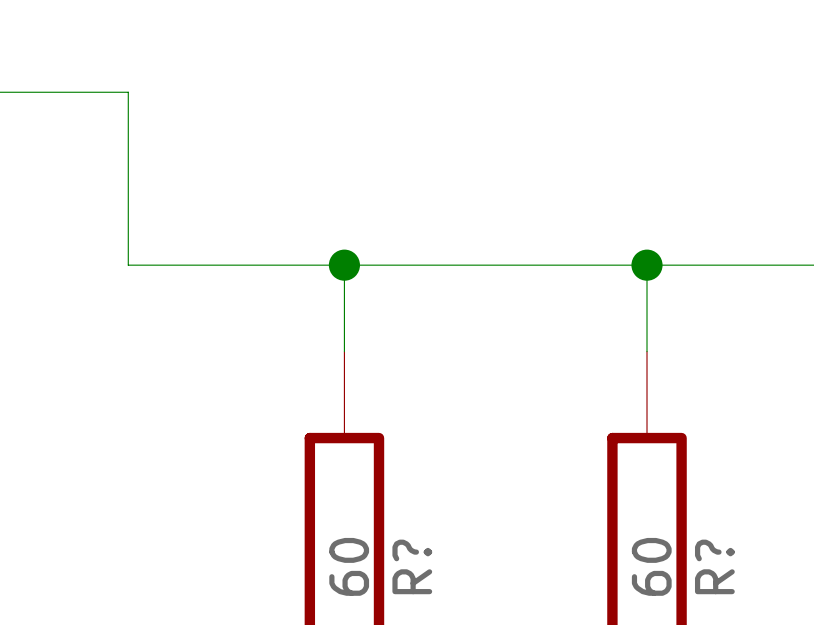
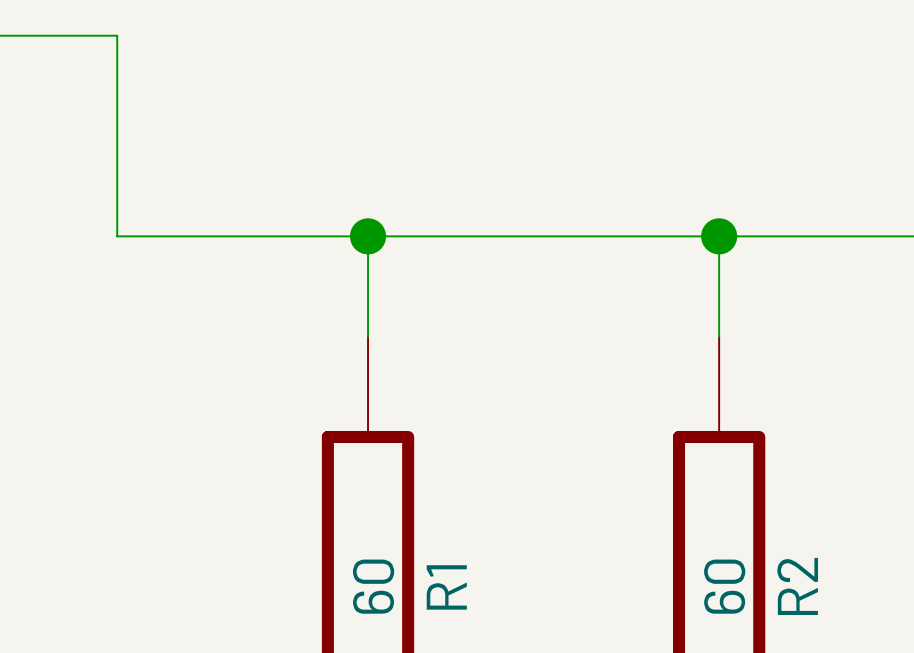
R? name: R? (412, 566) -> R1 (446, 587)
R? name: R? (714, 566) -> R2 (797, 586)

